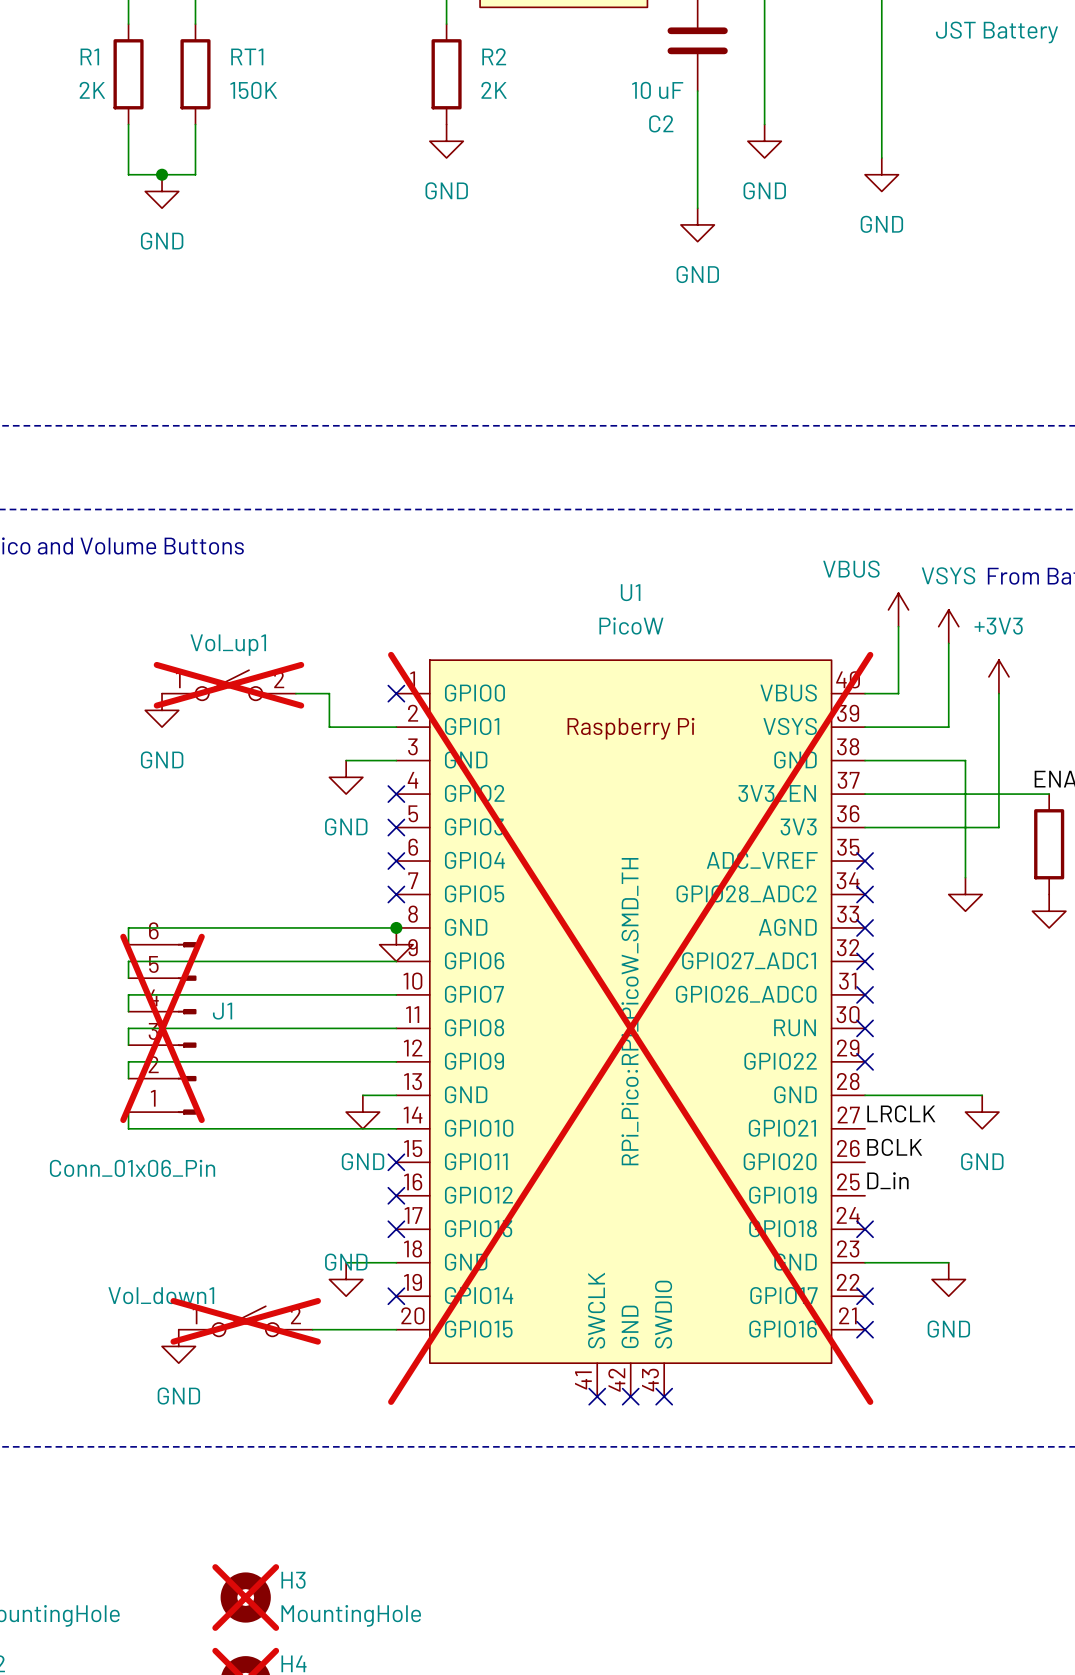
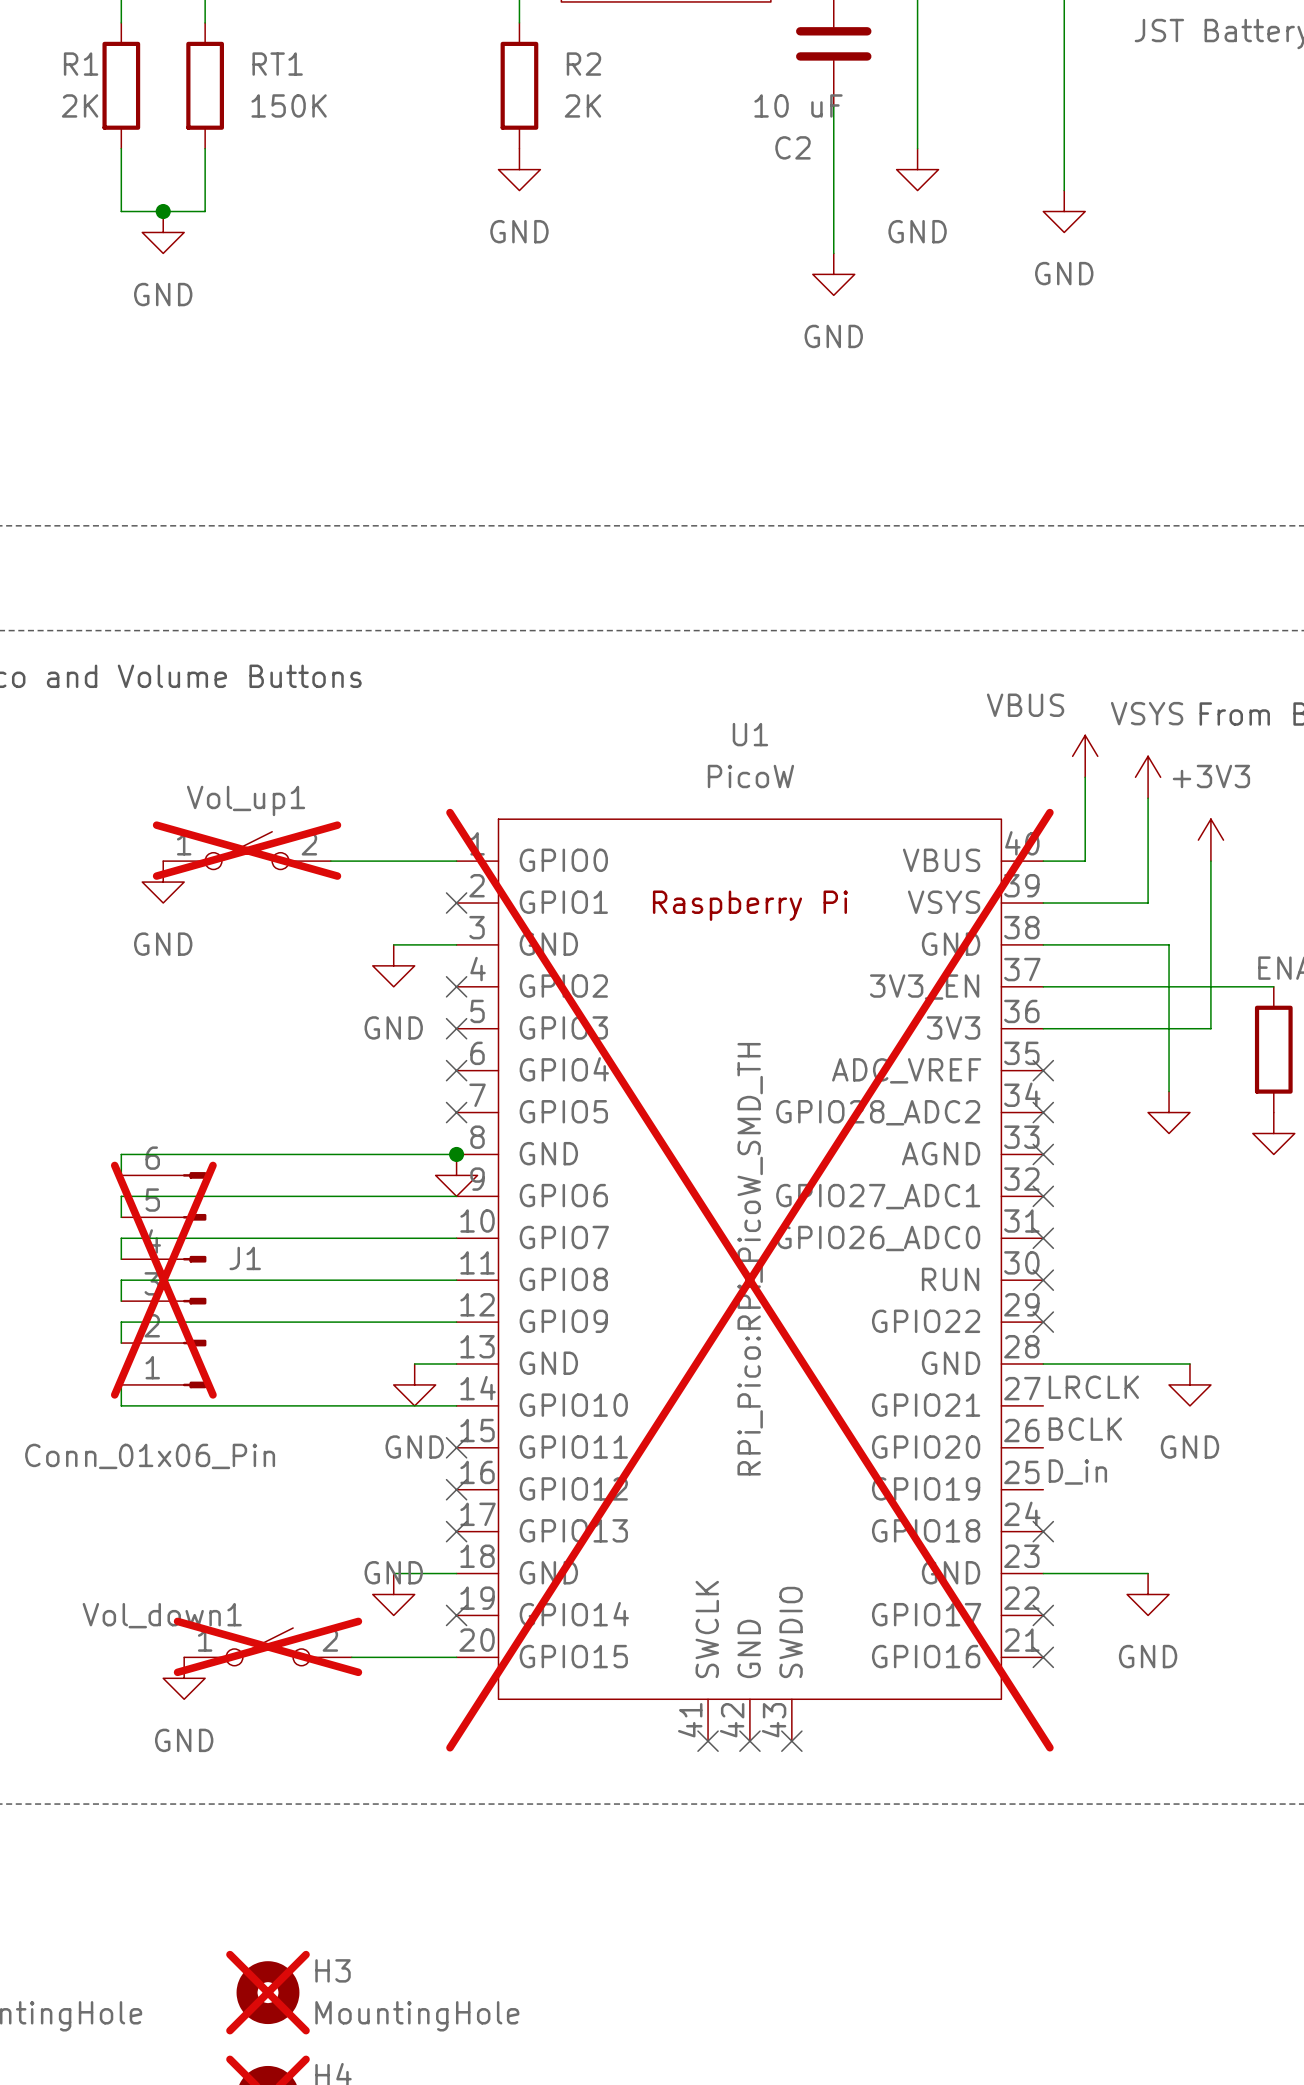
wire: (329, 693) (329, 727) (396, 727) -> (372, 861) (456, 861)
no-connect mark position: (396, 693) -> (456, 903)

